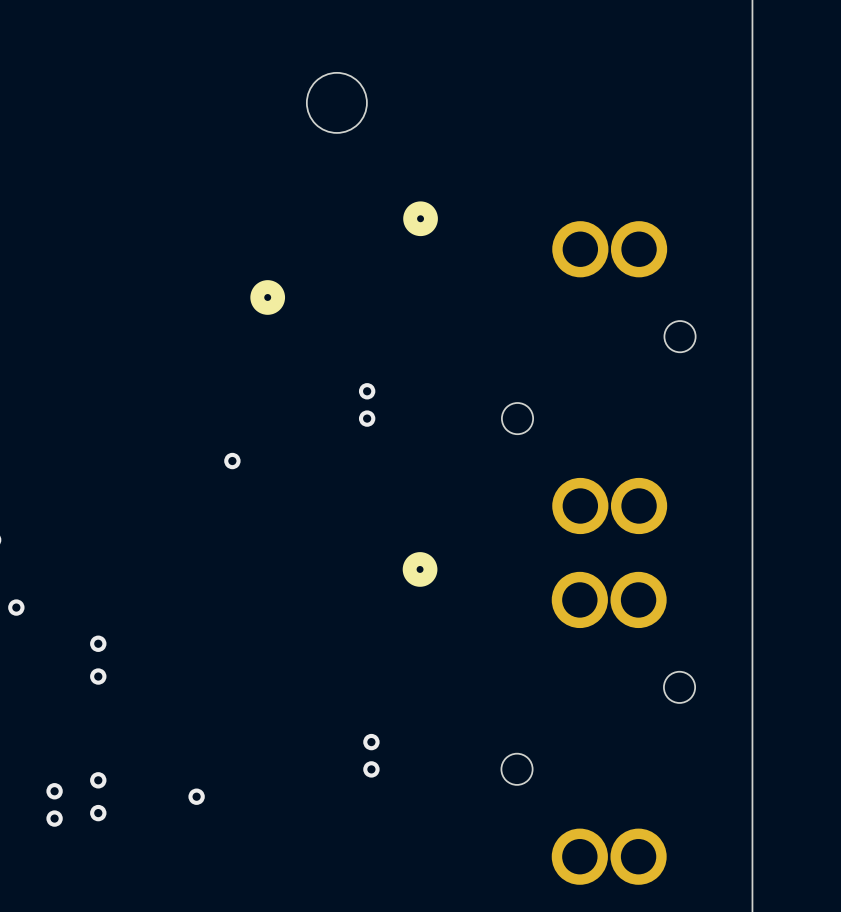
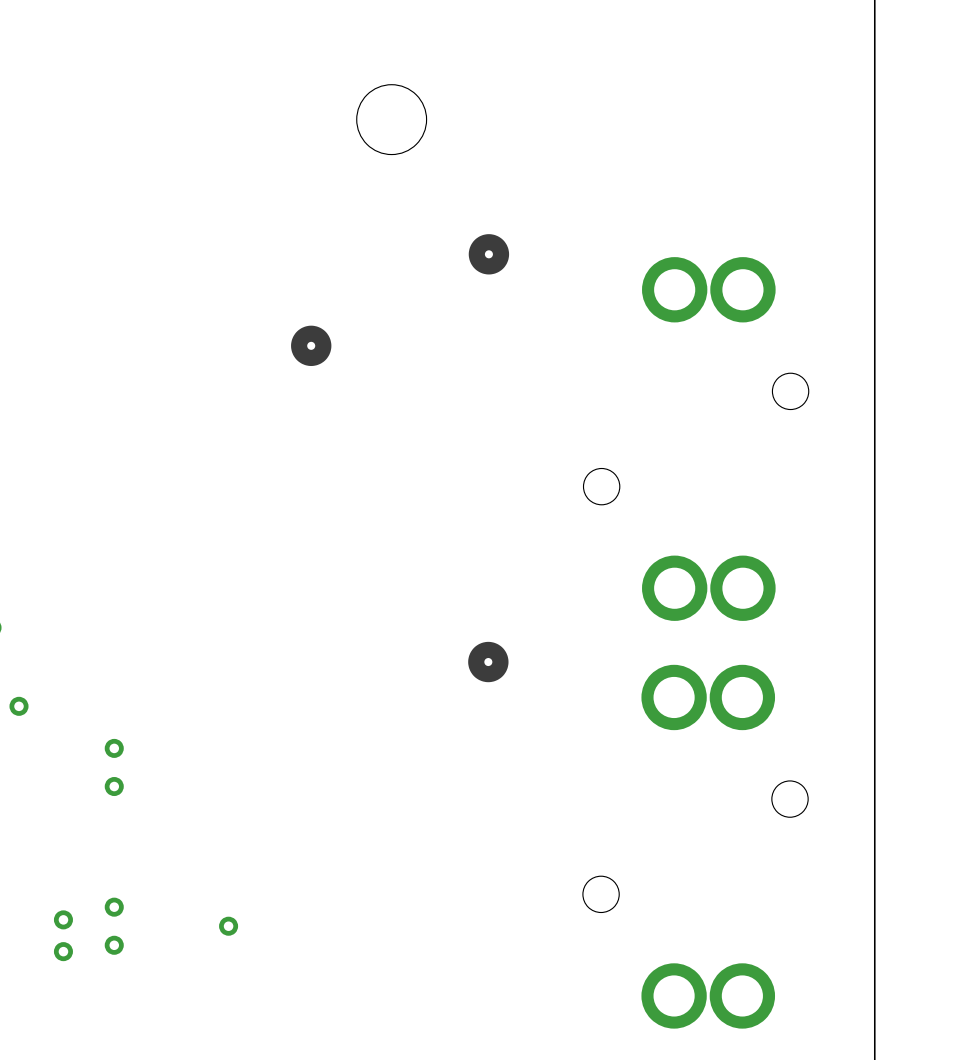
via: (367, 391) -> none
via: (367, 418) -> none
via: (232, 461) -> none
via: (371, 742) -> none
via: (371, 769) -> none

